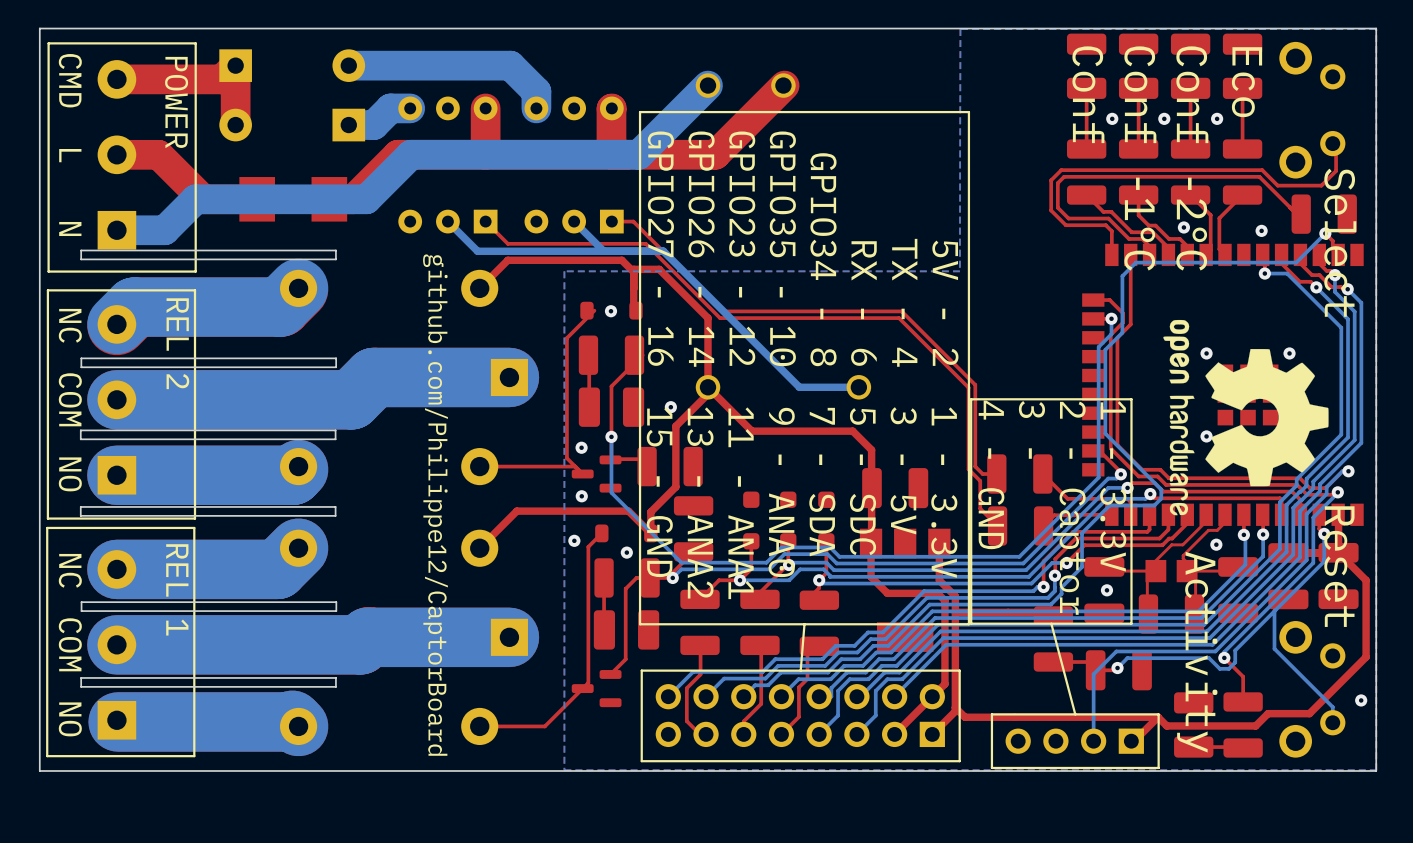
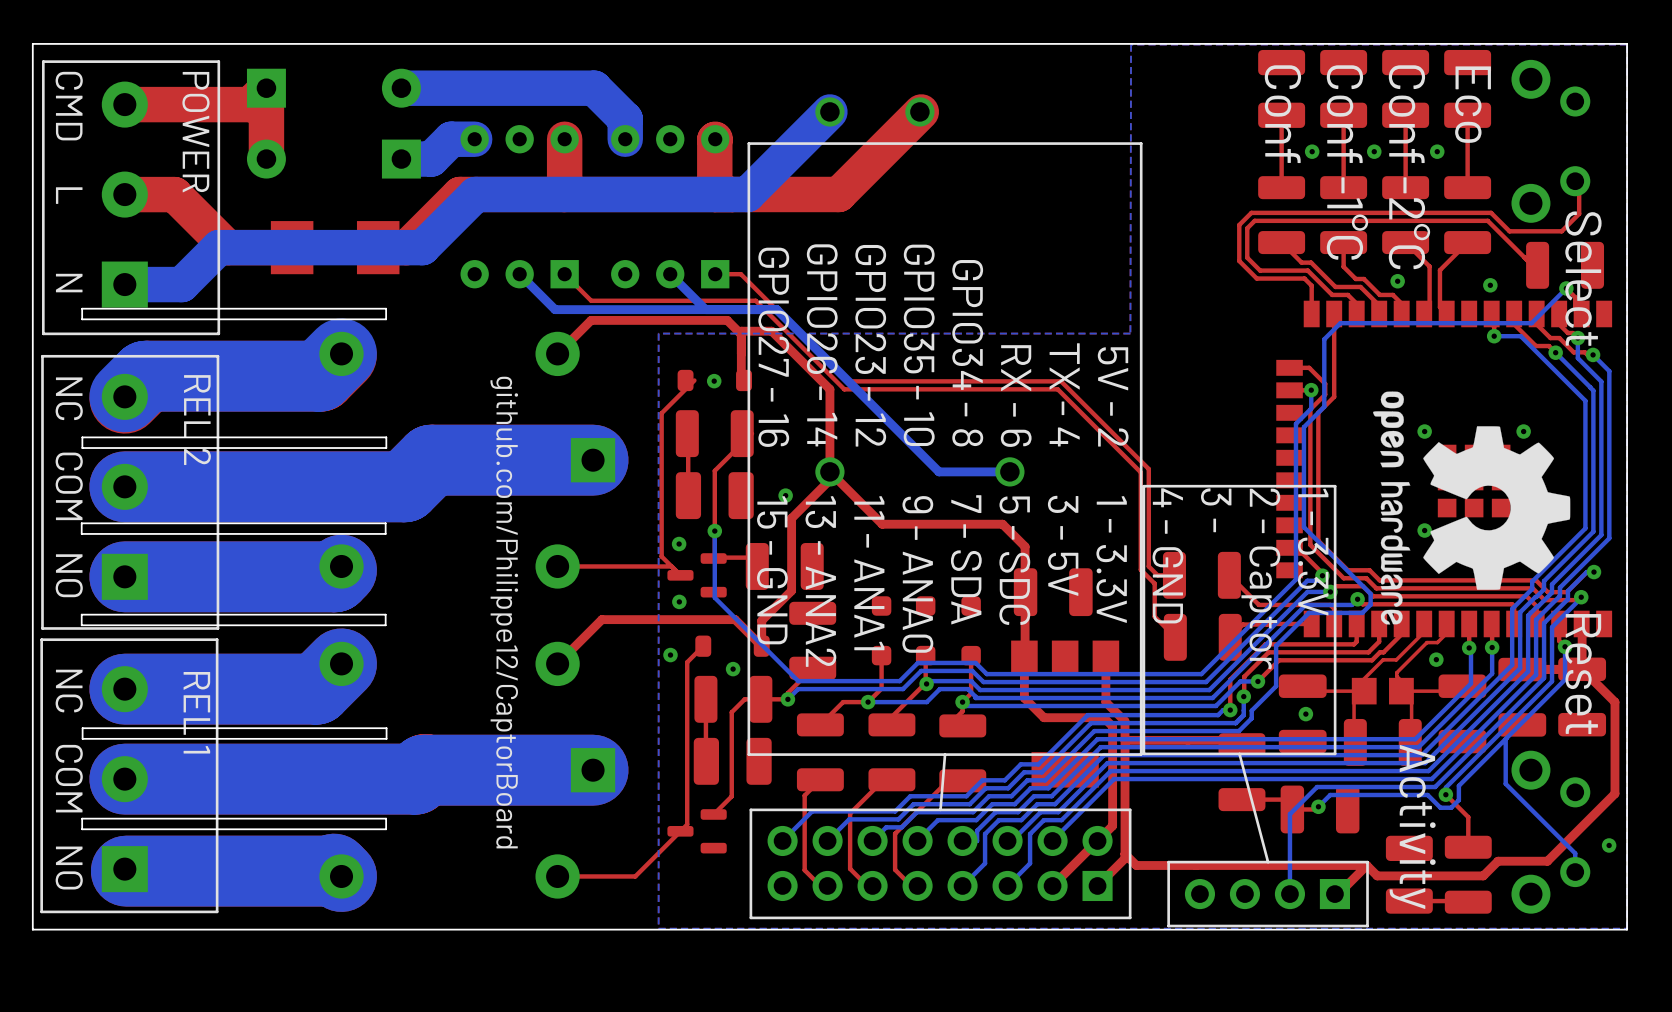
top track: (700, 645) (700, 674) (686, 688) -> (820, 779) (804, 795) (804, 830)
top track: (753, 645) (761, 653) (761, 703) (743, 721) (743, 734) -> (883, 779) (850, 813) (850, 868) (867, 885) (872, 885)
top track: (807, 645) (807, 678) (798, 687) (798, 716) (781, 734) -> (948, 780) (895, 833) (895, 869) (911, 885) (917, 885)

